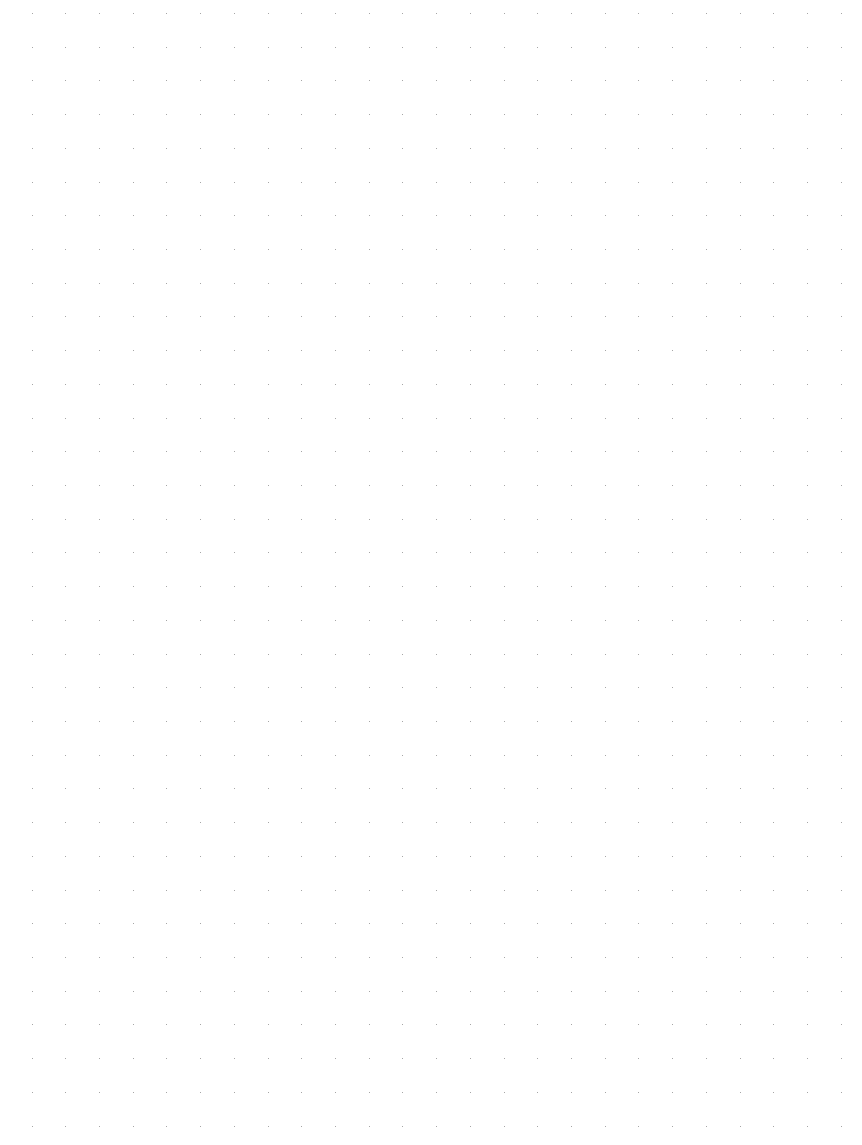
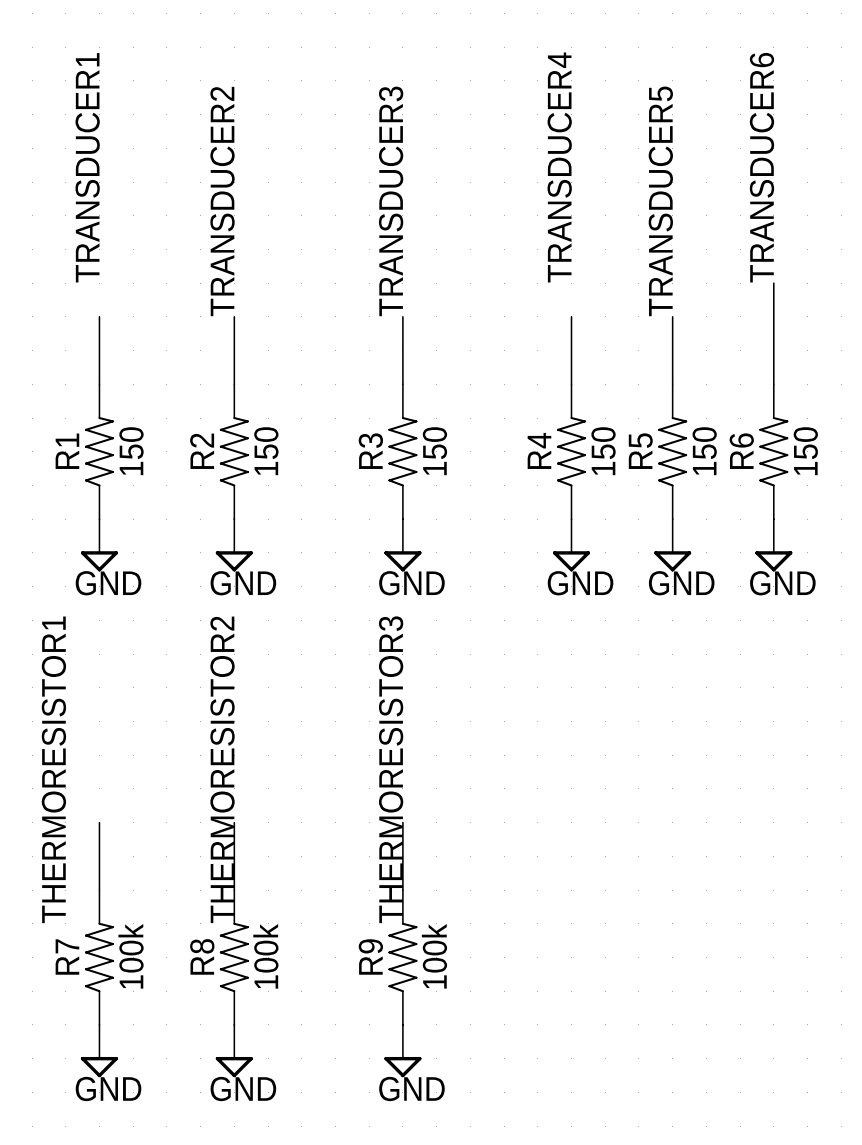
label: none -> TRANSDUCER1 (87, 167)
label: none -> TRANSDUCER4 (559, 167)
label: none -> TRANSDUCER6 (761, 167)
label: none -> TRANSDUCER2 (222, 201)
label: none -> TRANSDUCER3 (391, 201)
label: none -> TRANSDUCER5 (660, 201)
wire: none -> (773, 283) (773, 384)
wire: none -> (99, 316) (99, 384)
wire: none -> (234, 316) (234, 384)
wire: none -> (402, 316) (402, 384)
wire: none -> (571, 316) (571, 384)
wire: none -> (672, 316) (672, 384)
R1: none -> 150 (99, 451)
R2: none -> 150 (234, 451)
R3: none -> 150 (402, 451)
R4: none -> 150 (571, 451)
R5: none -> 150 (672, 451)
R6: none -> 150 (773, 451)
power symbol: none -> GND (99, 545)
power symbol: none -> GND (234, 545)
power symbol: none -> GND (402, 545)
power symbol: none -> GND (571, 545)
power symbol: none -> GND (672, 545)
power symbol: none -> GND (773, 545)
label: none -> THERMORESISTOR1 (53, 769)
label: none -> THERMORESISTOR2 (222, 769)
label: none -> THERMORESISTOR3 (391, 769)
wire: none -> (99, 822) (99, 890)
wire: none -> (234, 822) (234, 890)
wire: none -> (402, 822) (402, 890)
R7: none -> 100k (99, 957)
R8: none -> 100k (234, 957)
R9: none -> 100k (402, 957)
power symbol: none -> GND (99, 1051)
power symbol: none -> GND (234, 1051)
power symbol: none -> GND (402, 1051)

